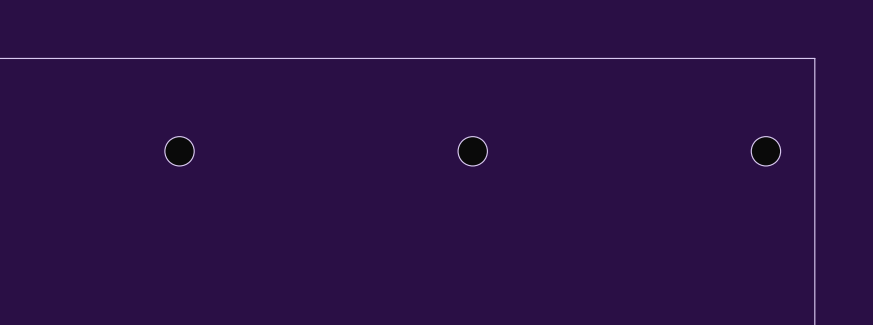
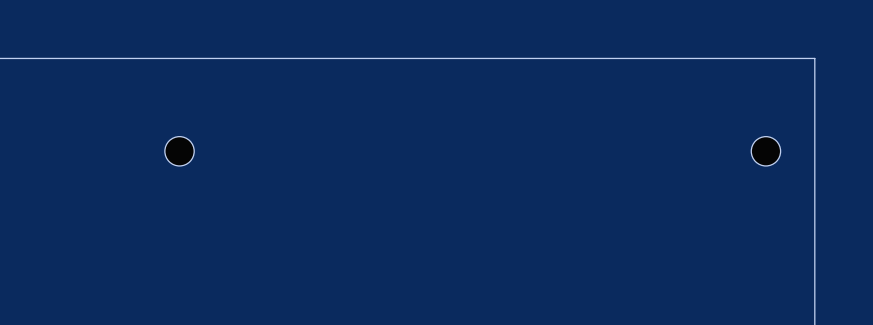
part: (472, 151) -> none

